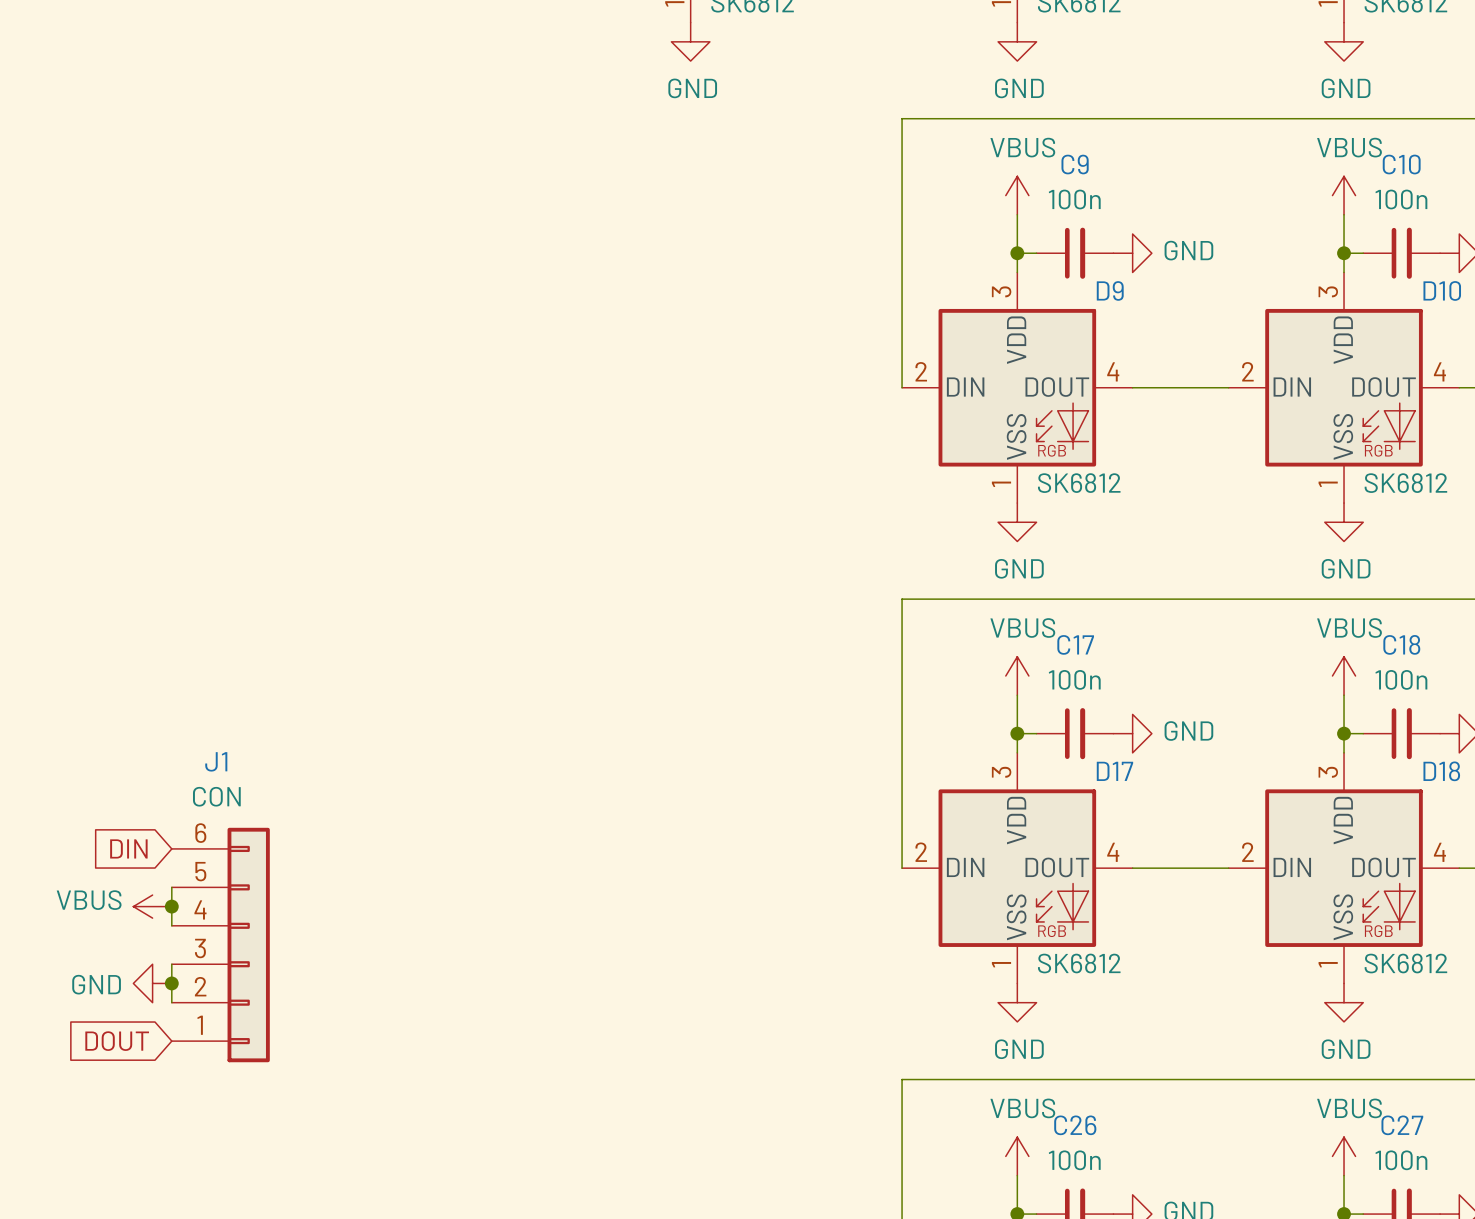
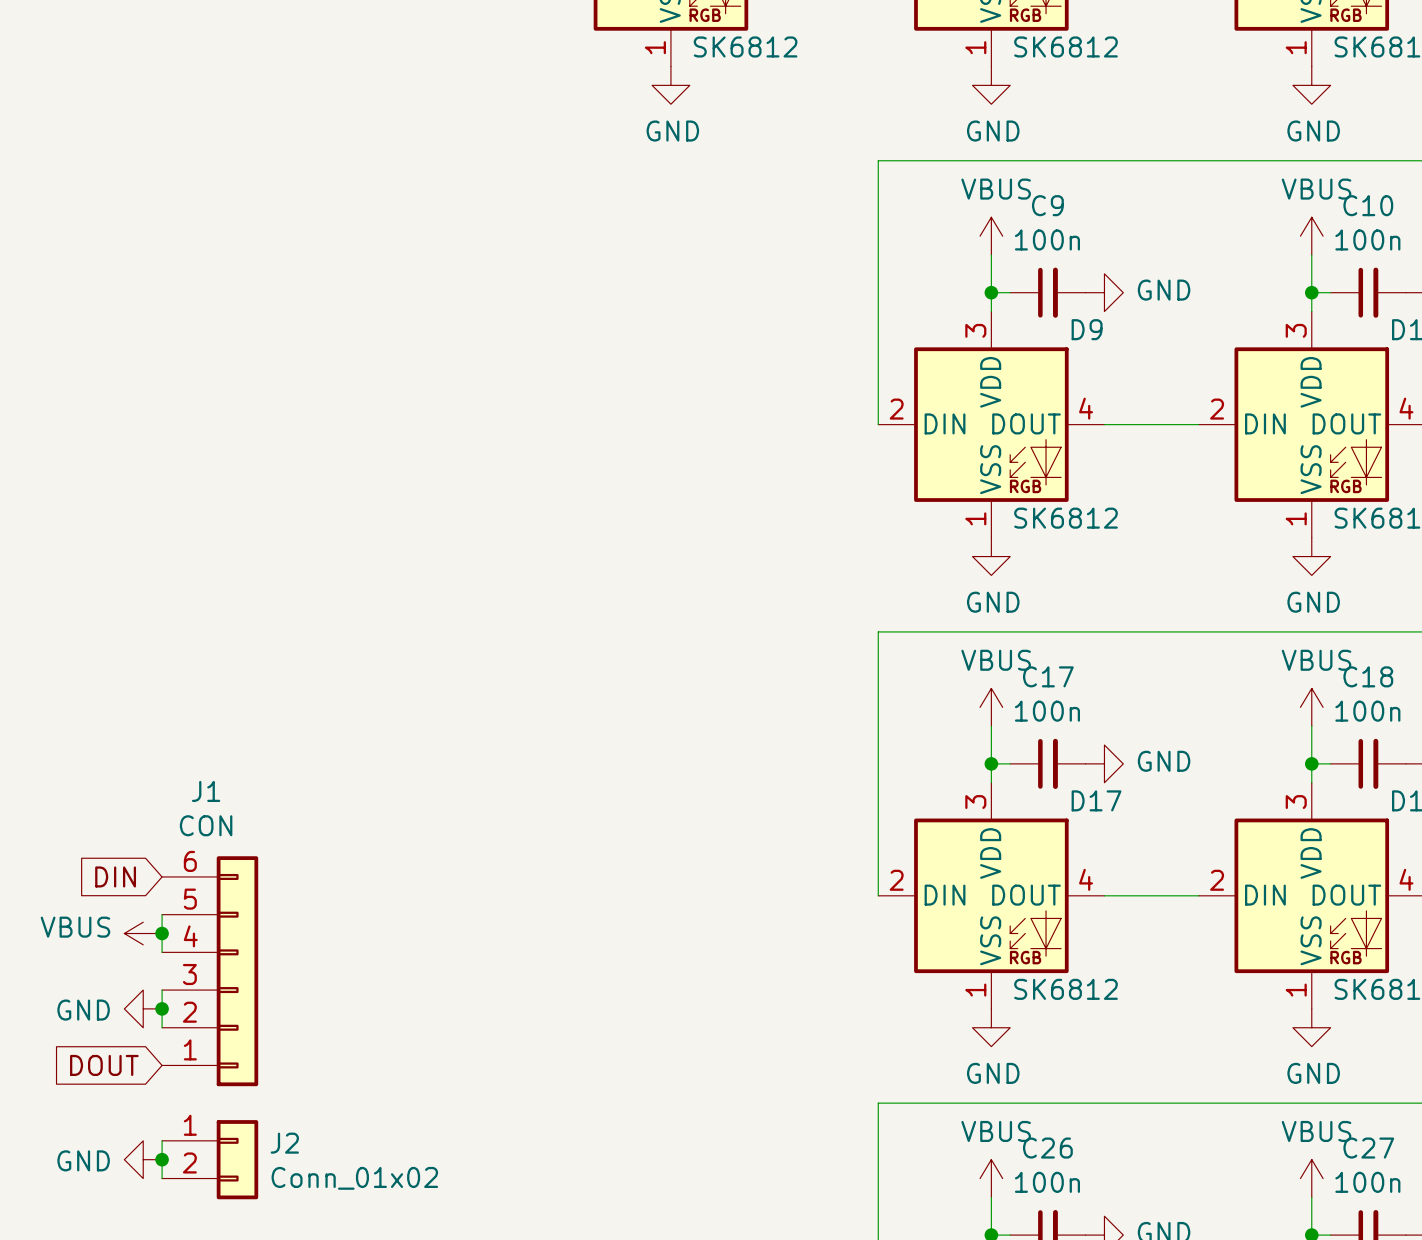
wire: none -> (162, 1140) (162, 1178)
power symbol: none -> GND (143, 1159)
junction: none -> (162, 1159)
J2: none -> Conn_01x02 (210, 1159)

